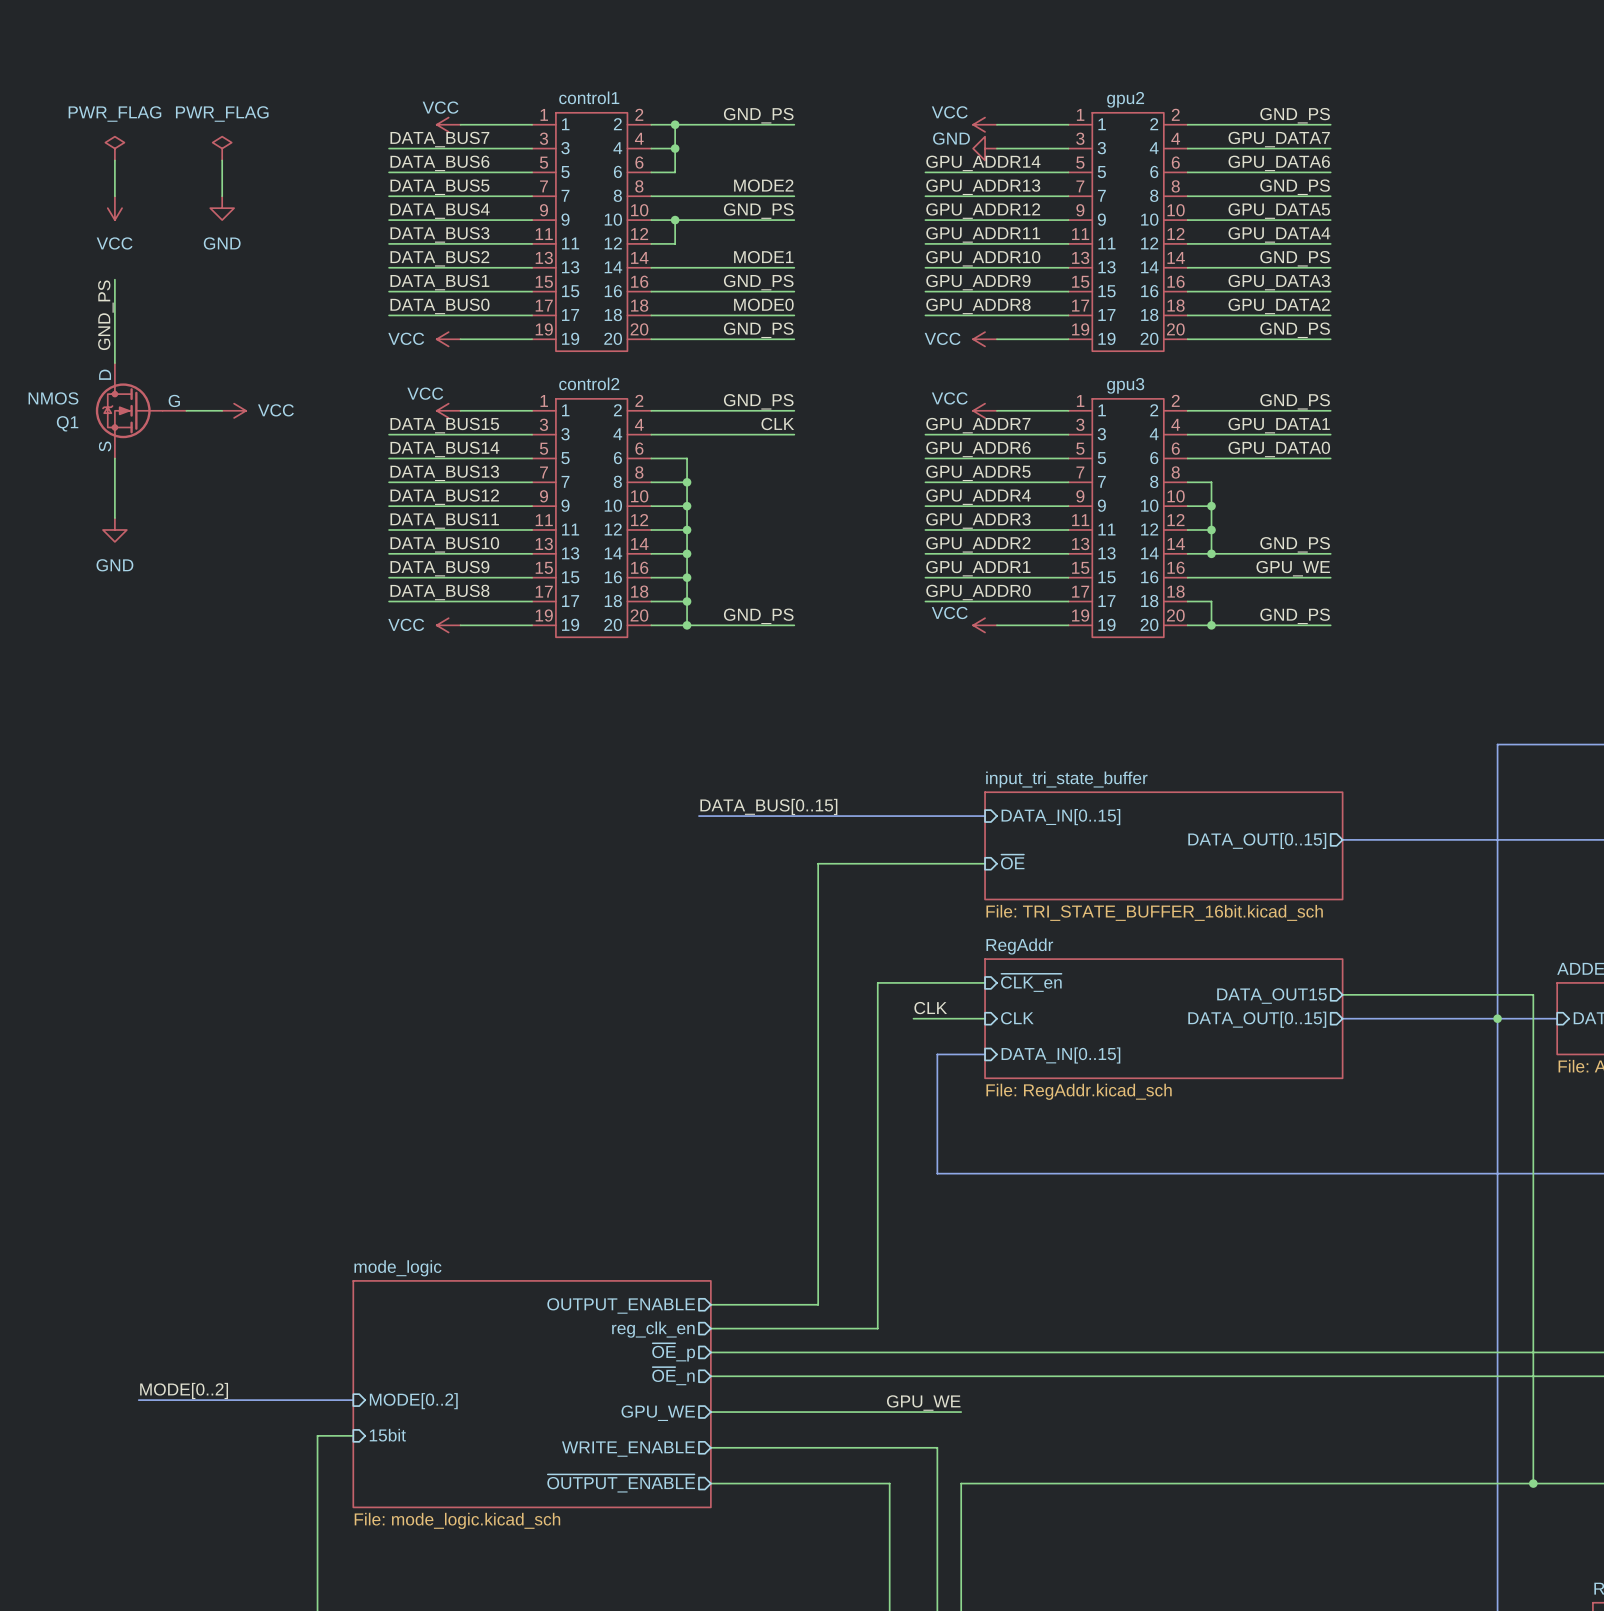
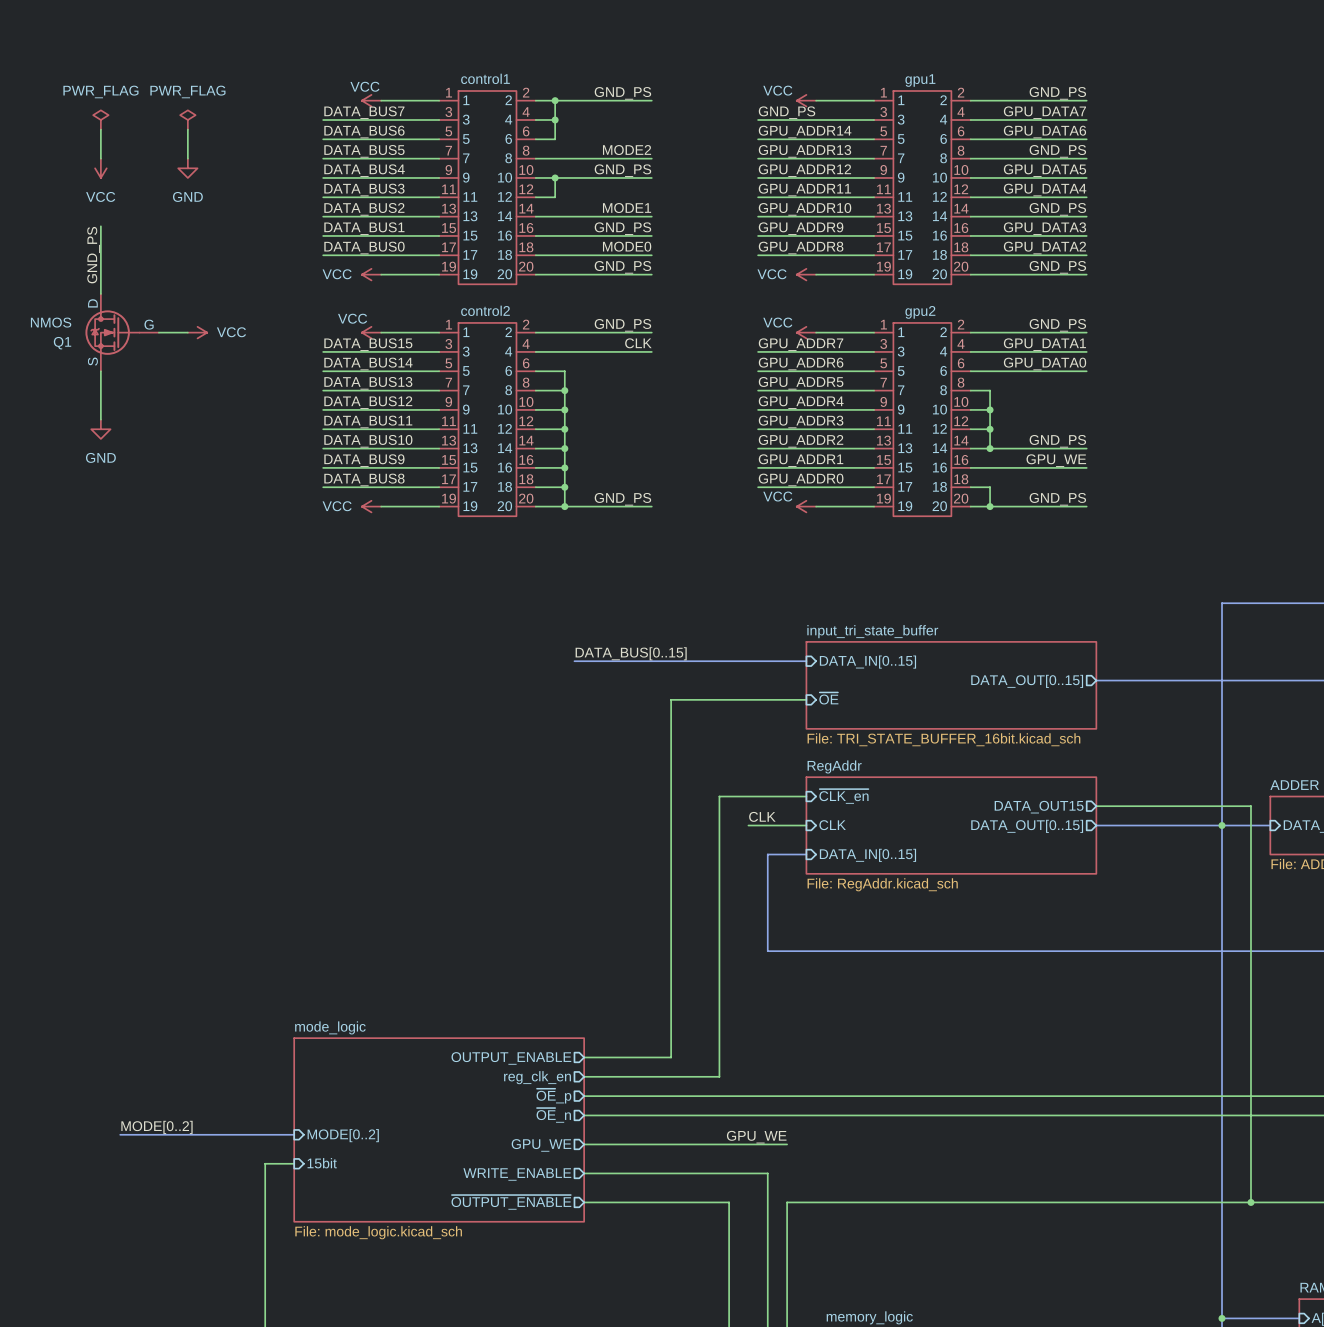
gpu2 name: gpu2 (1125, 99) -> gpu1 (920, 80)
label: none -> GND_PS (787, 112)
wire: none -> (758, 119) (816, 119)
power symbol: GND (985, 148) -> none
gpu3 name: gpu3 (1125, 385) -> gpu2 (920, 312)

